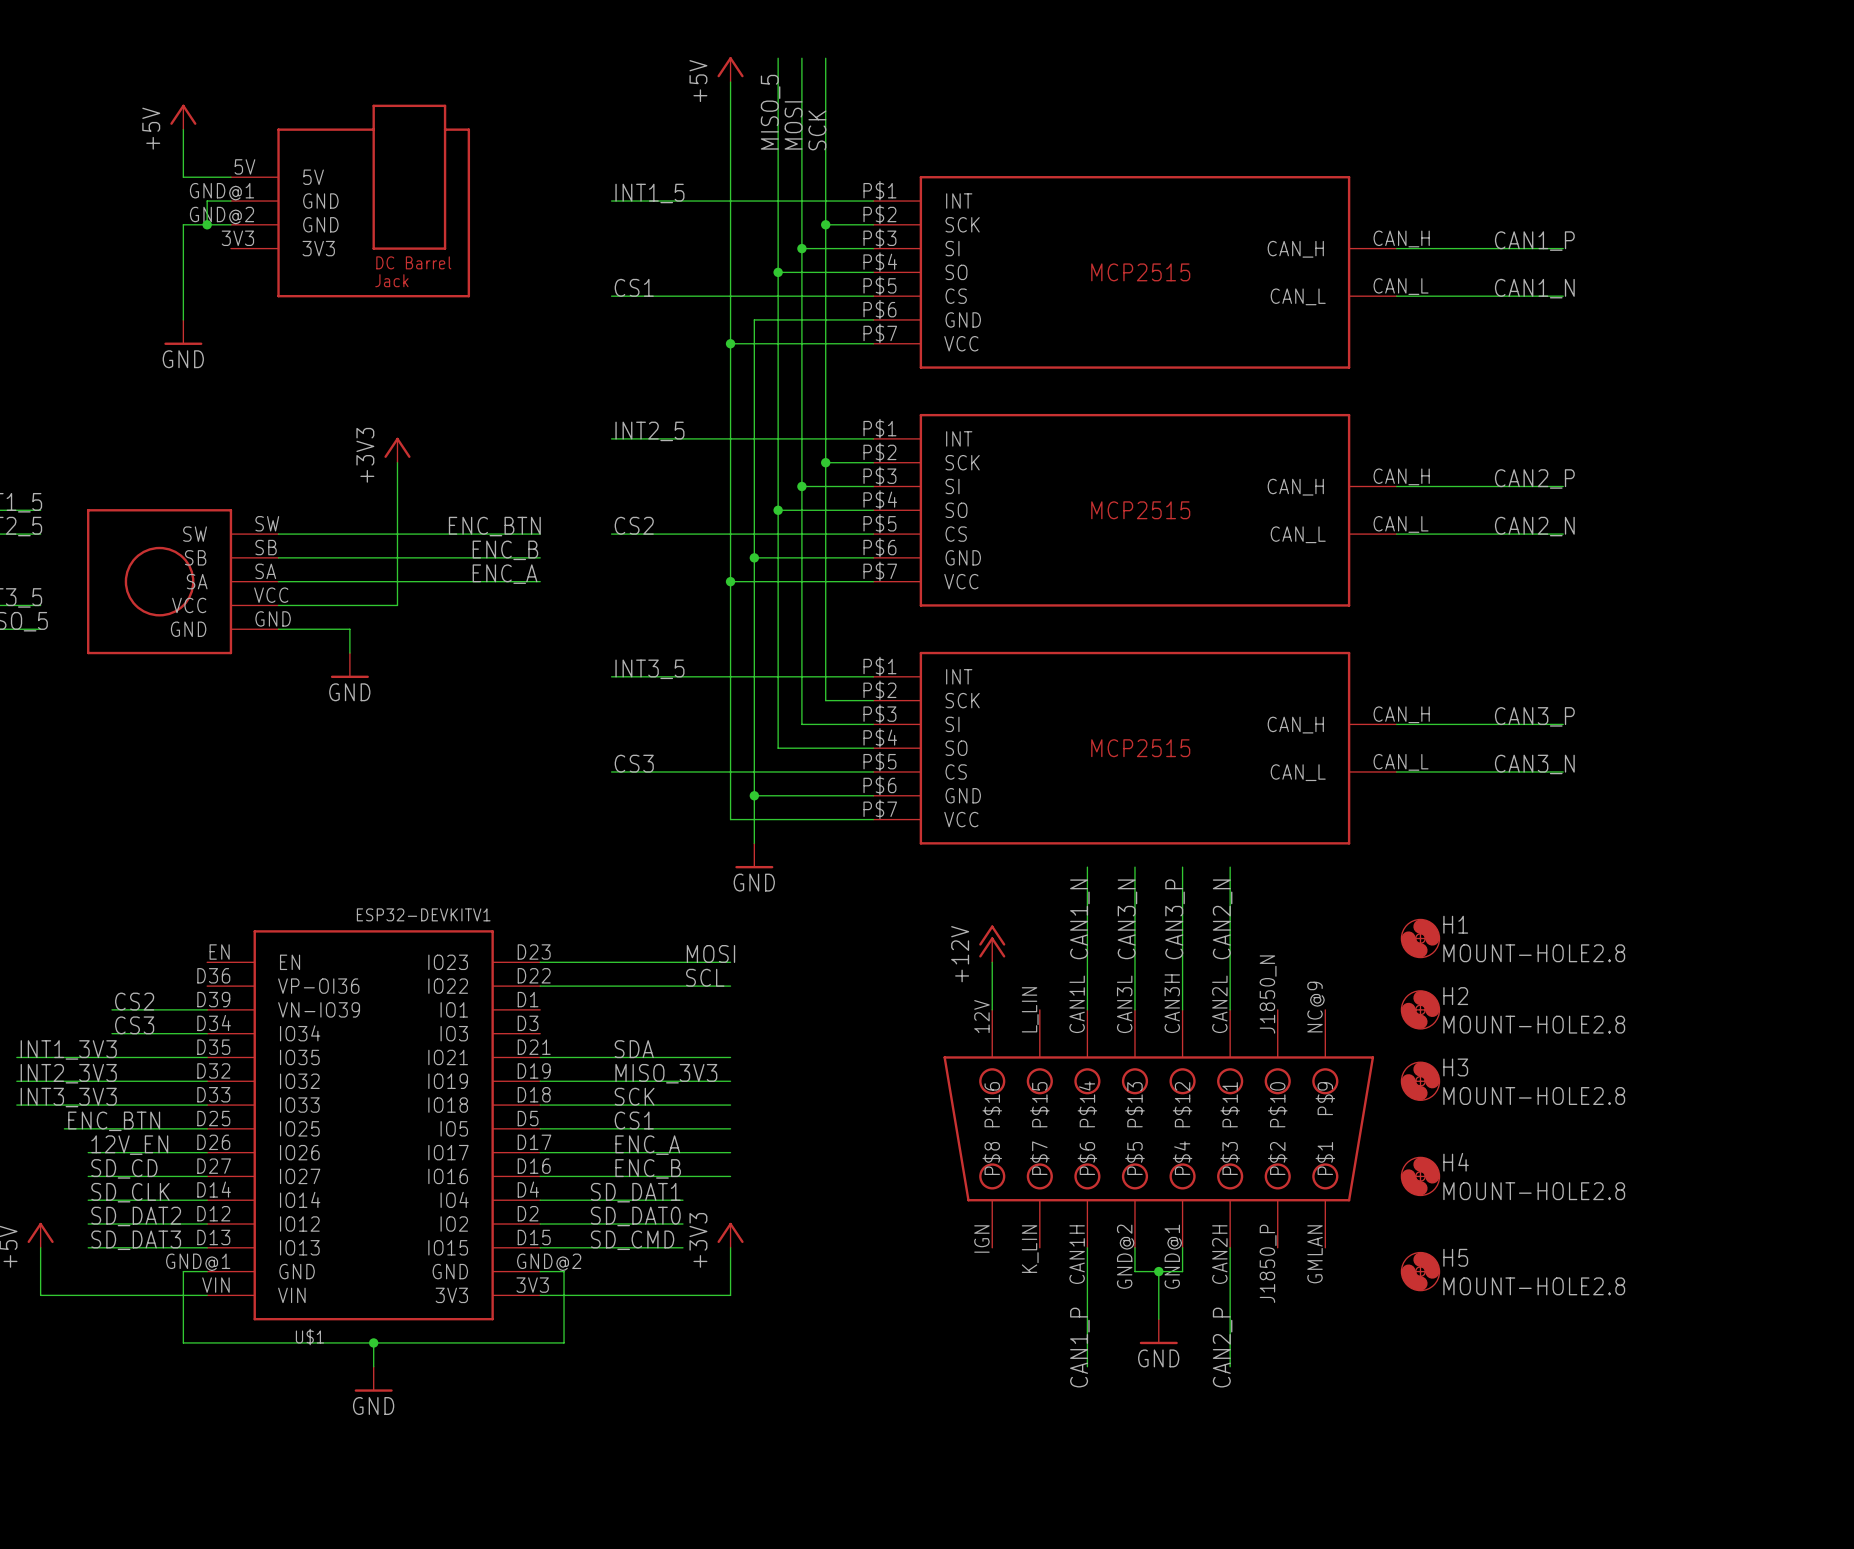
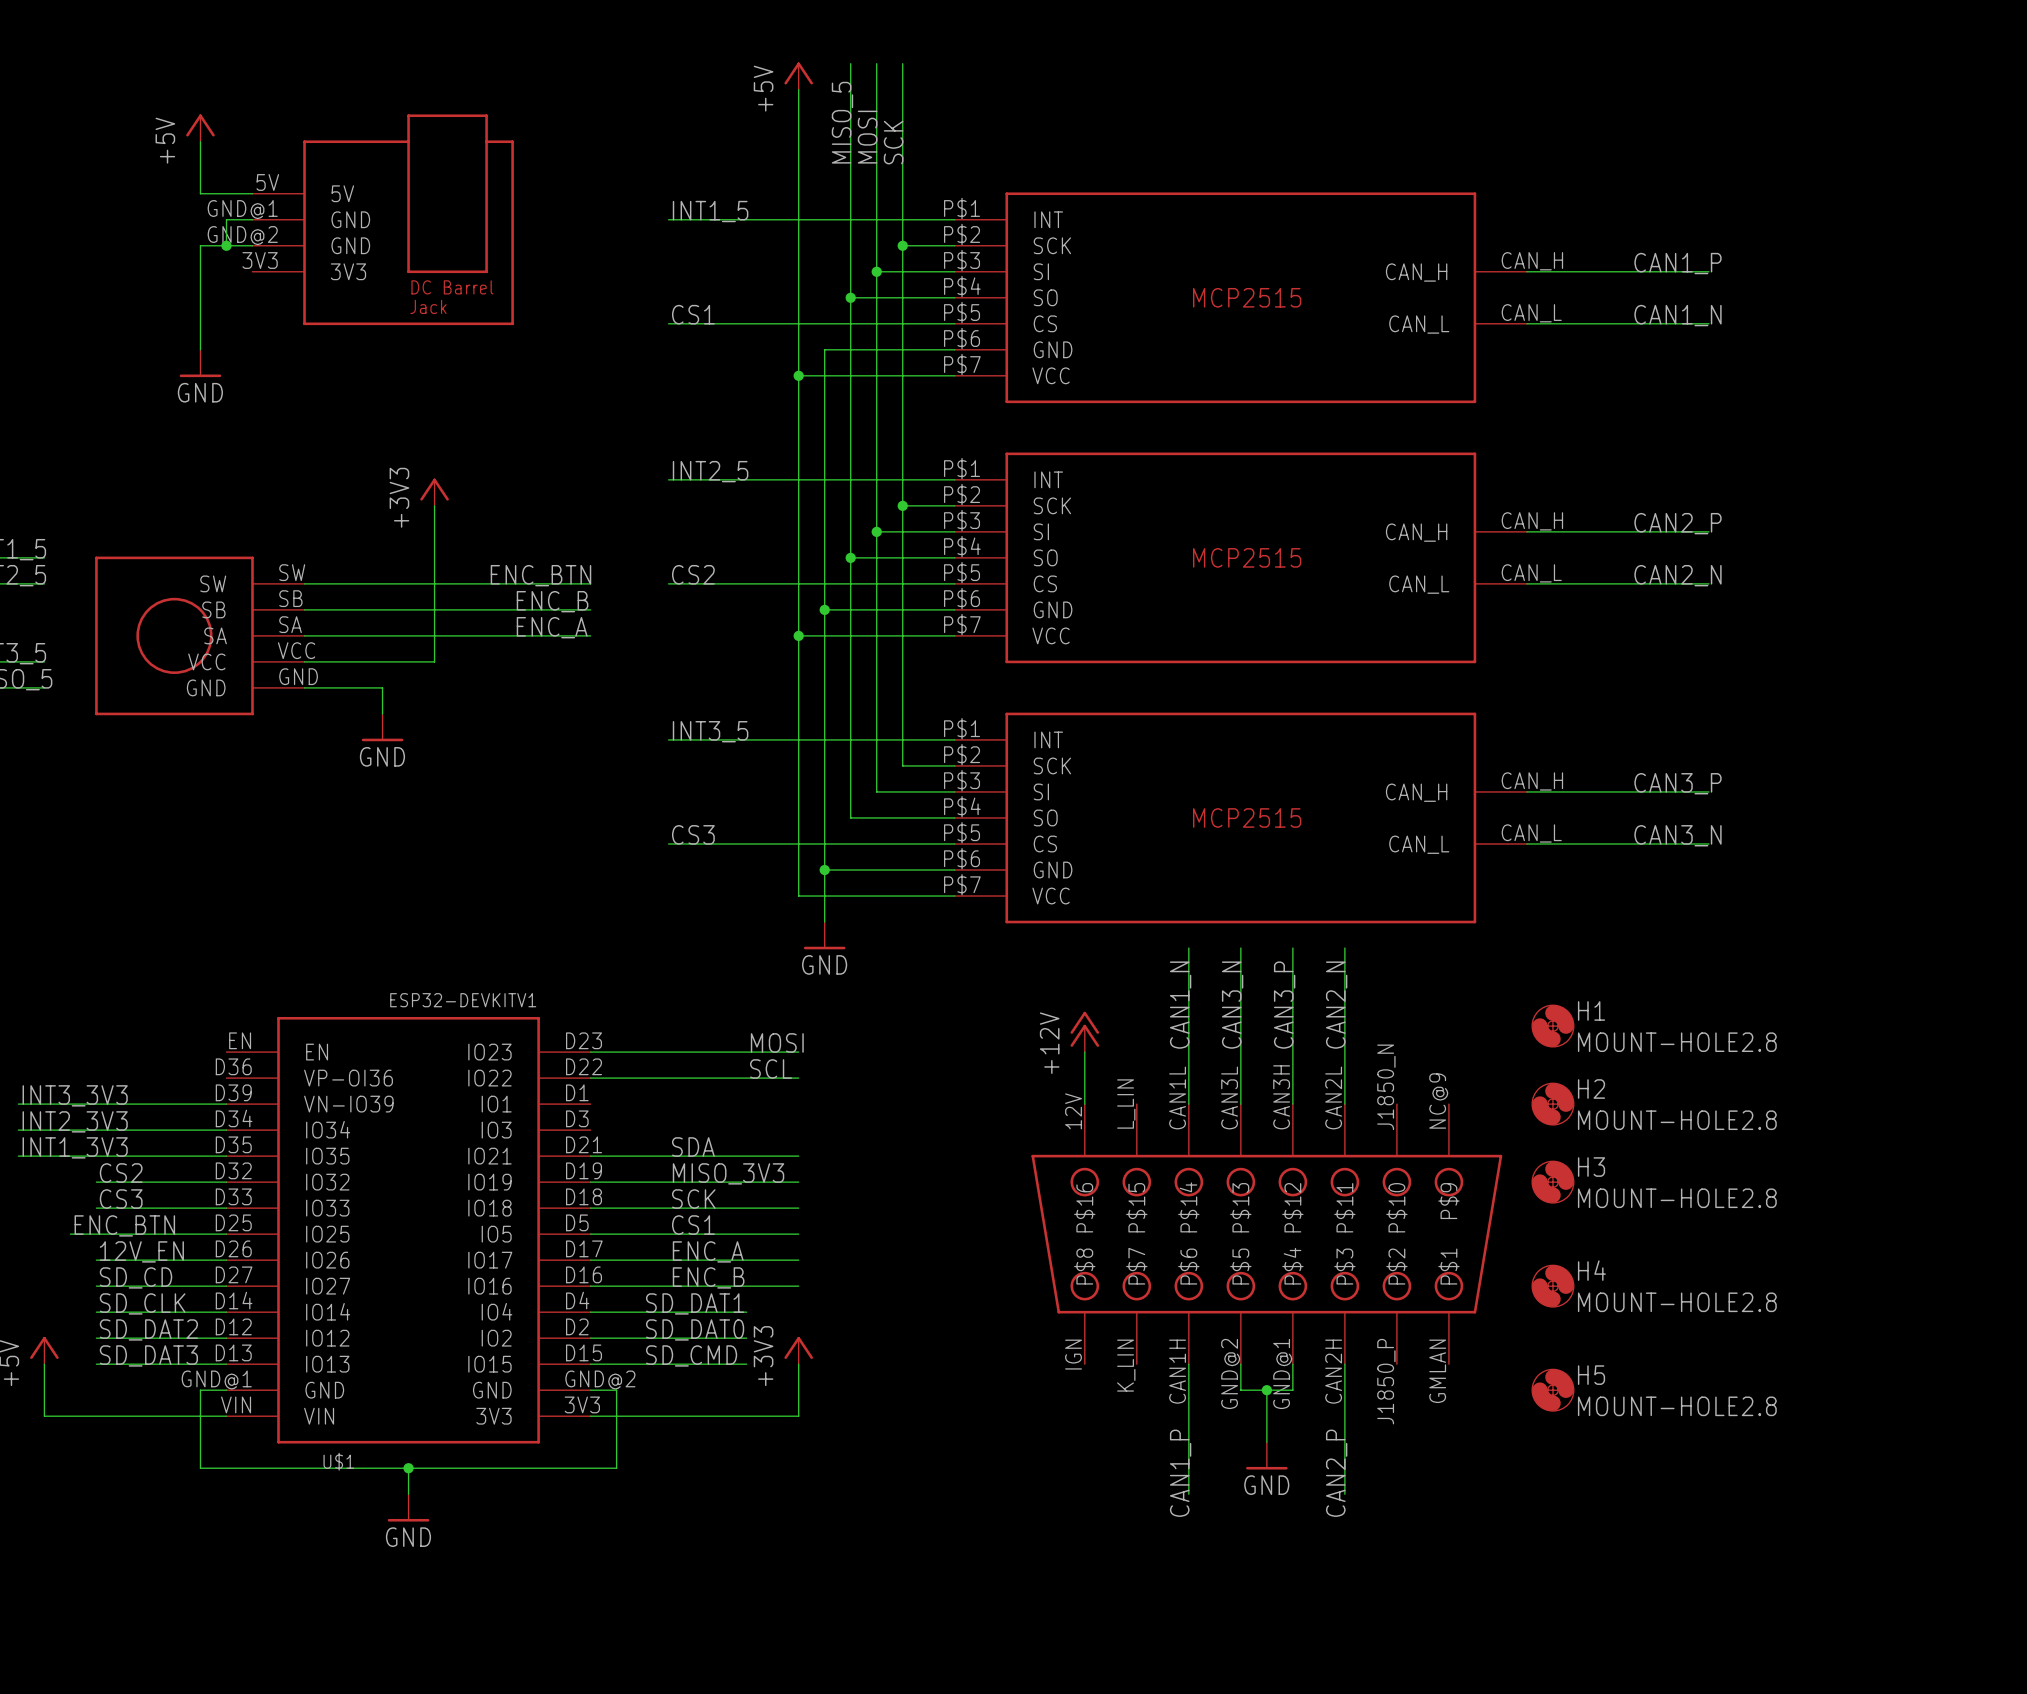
label position: CS2 (134, 1001) -> CS2 (121, 1173)
wire: none -> (18, 1104) (122, 1104)
label position: CS3 (134, 1025) -> CS3 (121, 1199)
wire: none -> (18, 1130) (122, 1130)
label position: INT2_3V3 (68, 1073) -> INT2_3V3 (75, 1121)
wire: (16, 1081) (88, 1081) -> none
label position: INT3_3V3 (68, 1097) -> INT3_3V3 (75, 1095)
wire: (16, 1105) (88, 1105) -> none

